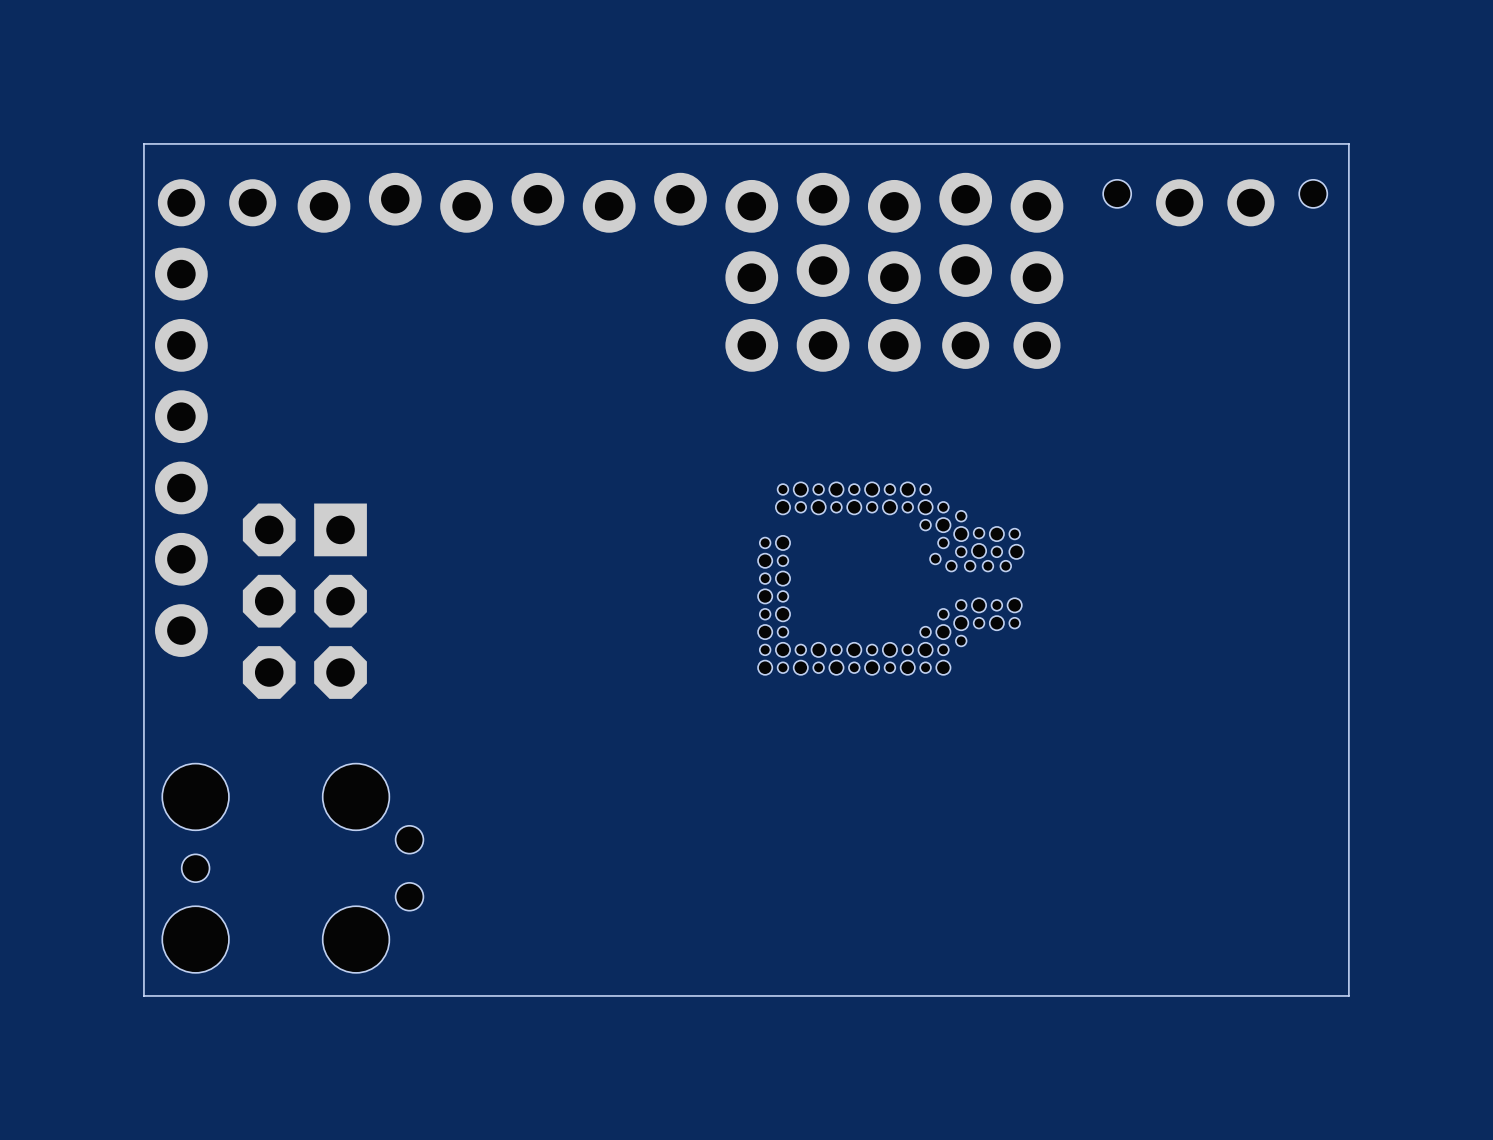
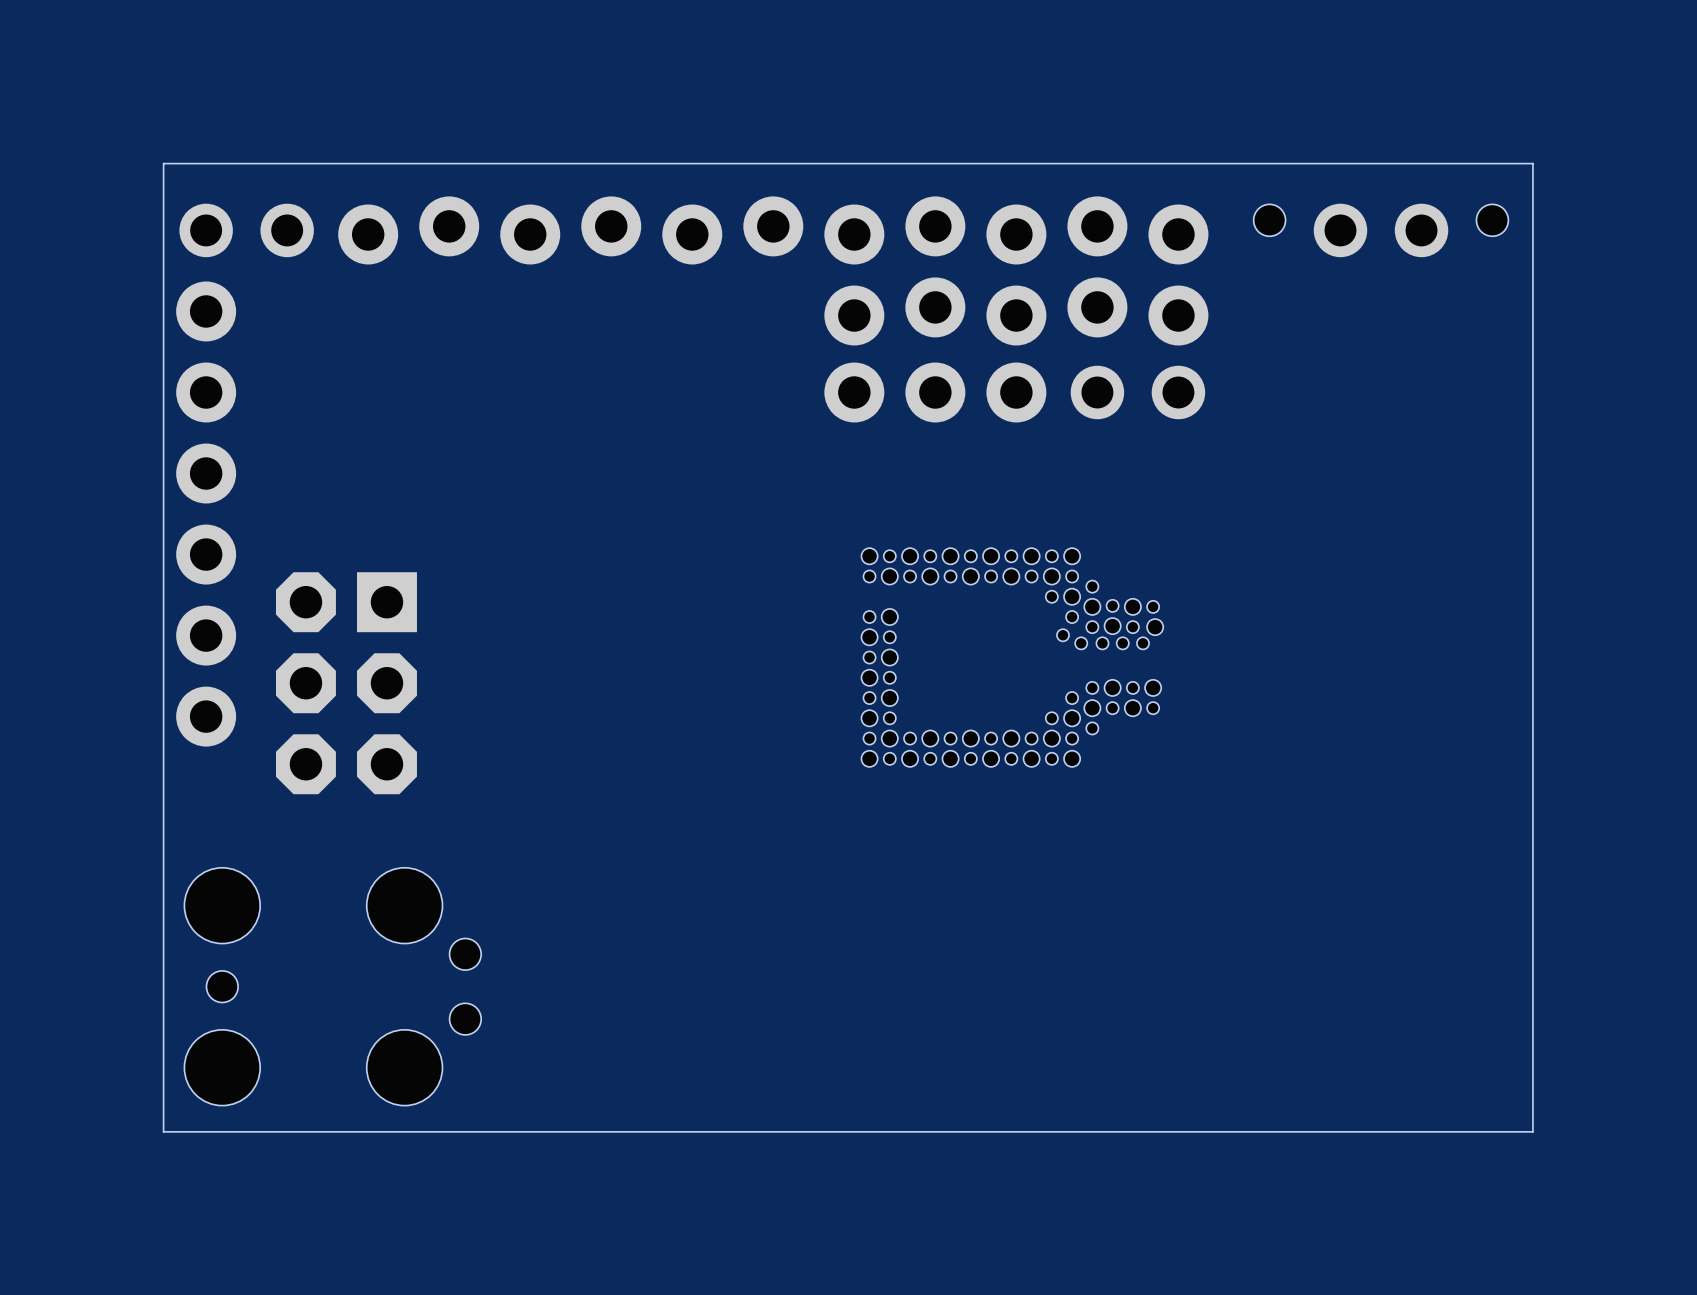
hole: none -> (869, 556)
hole: none -> (1072, 556)
hole: none -> (869, 576)

